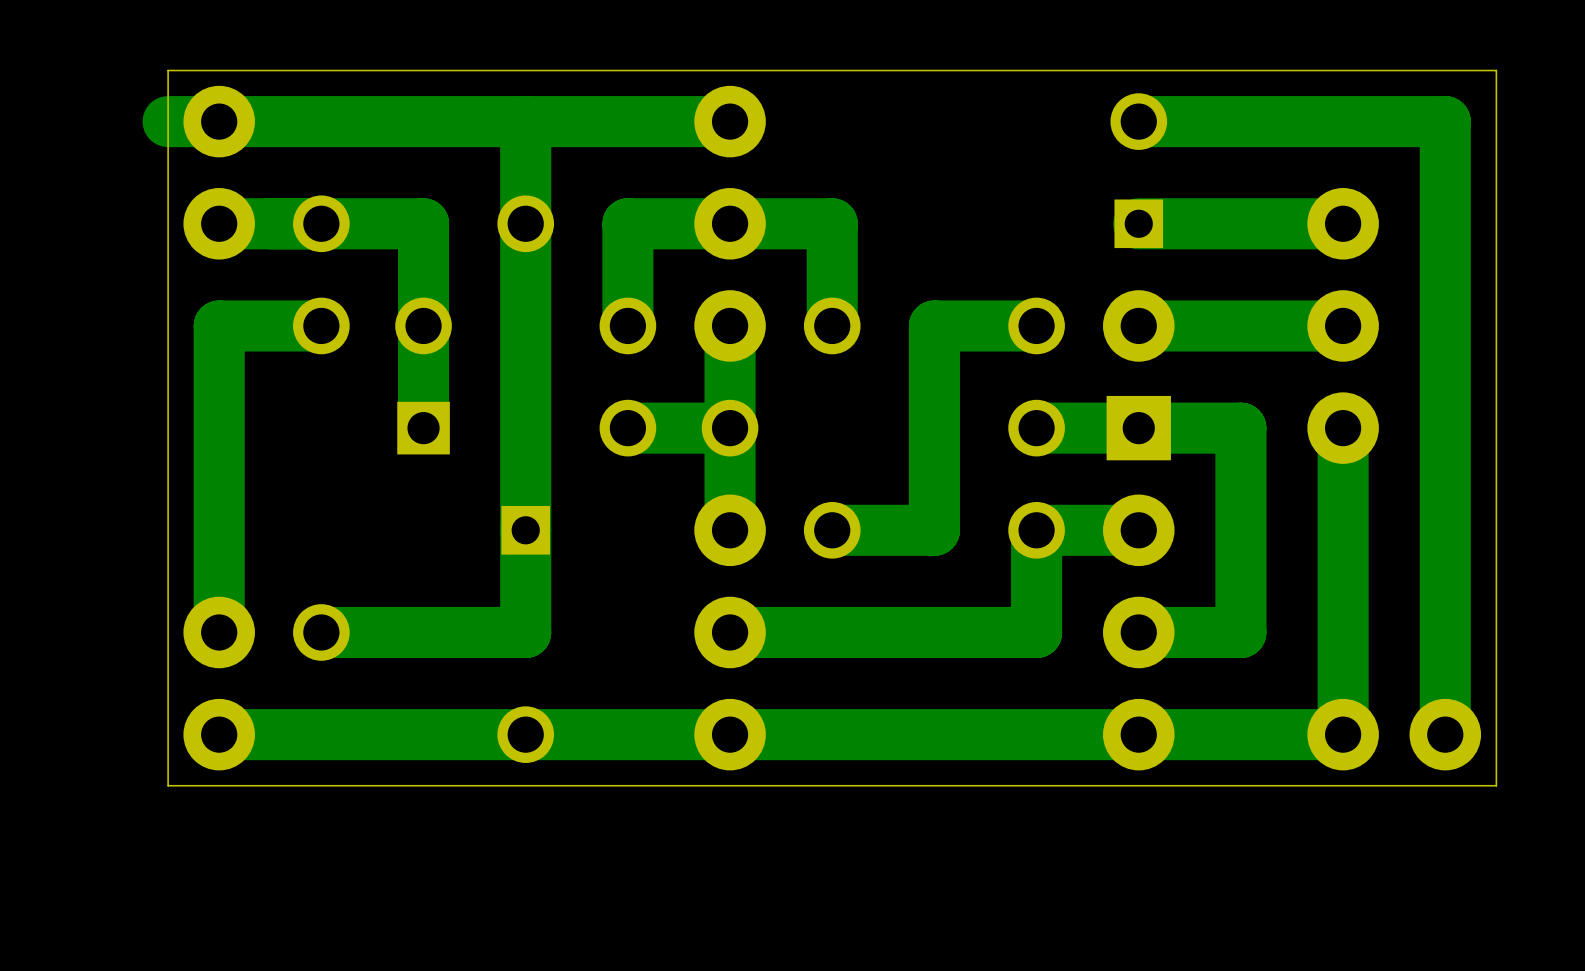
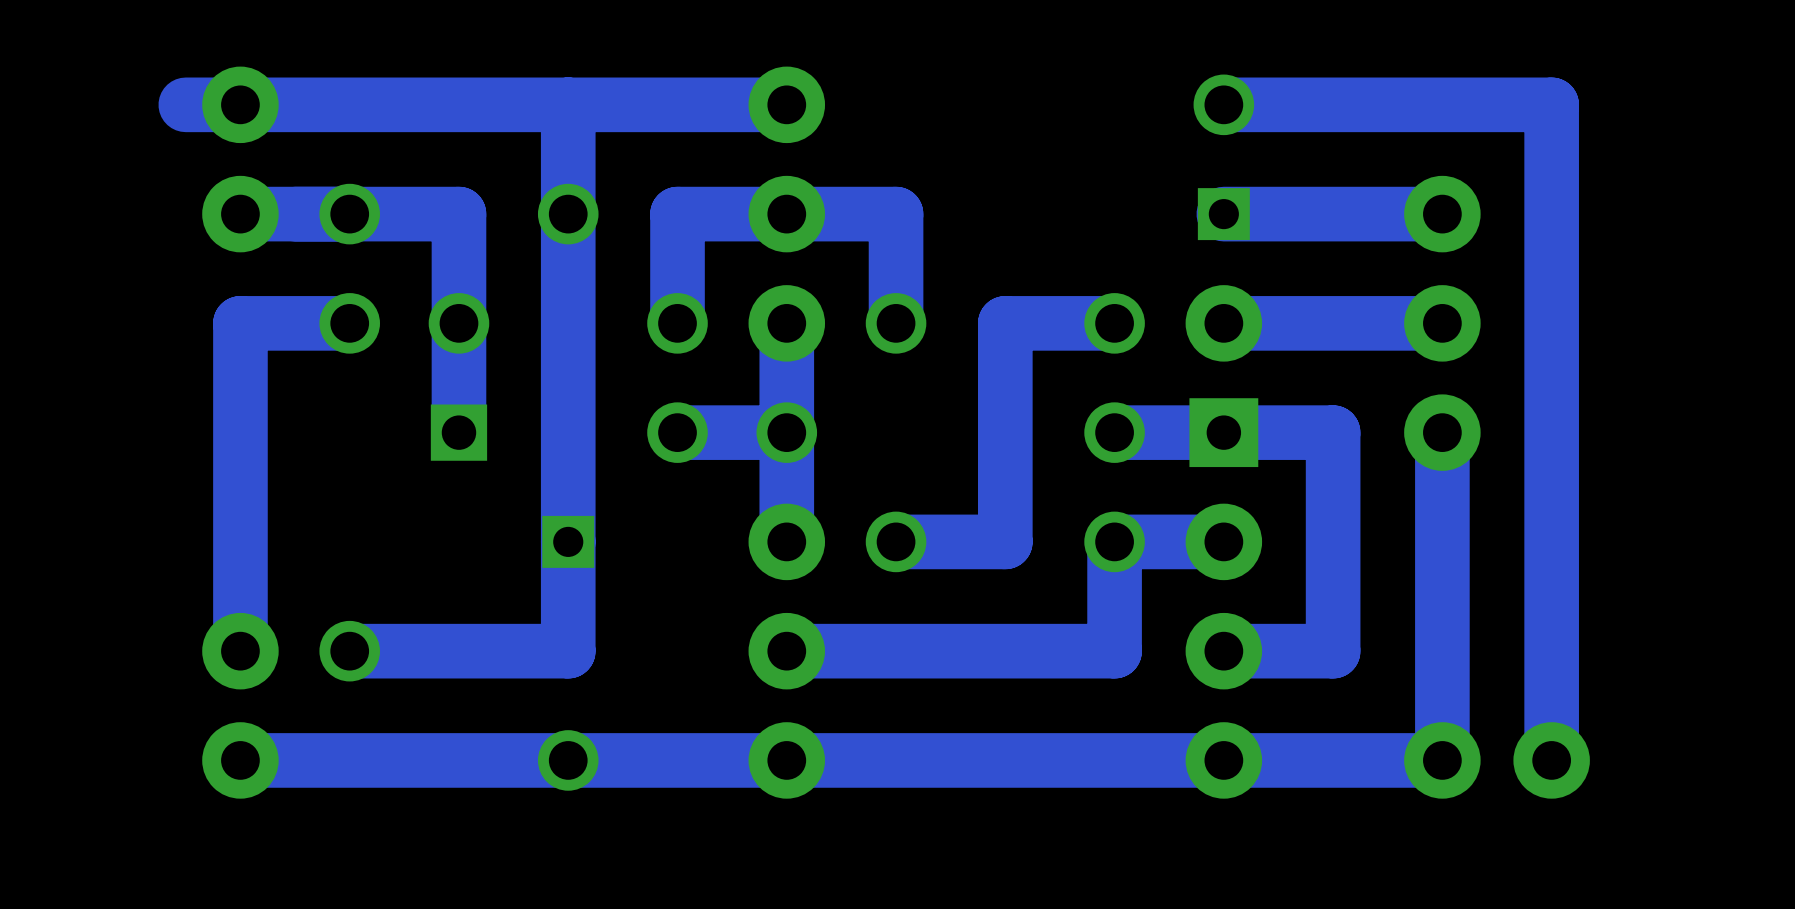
board edge: (1496, 70) (168, 70) (168, 785) (1496, 785) (1496, 70) -> none

